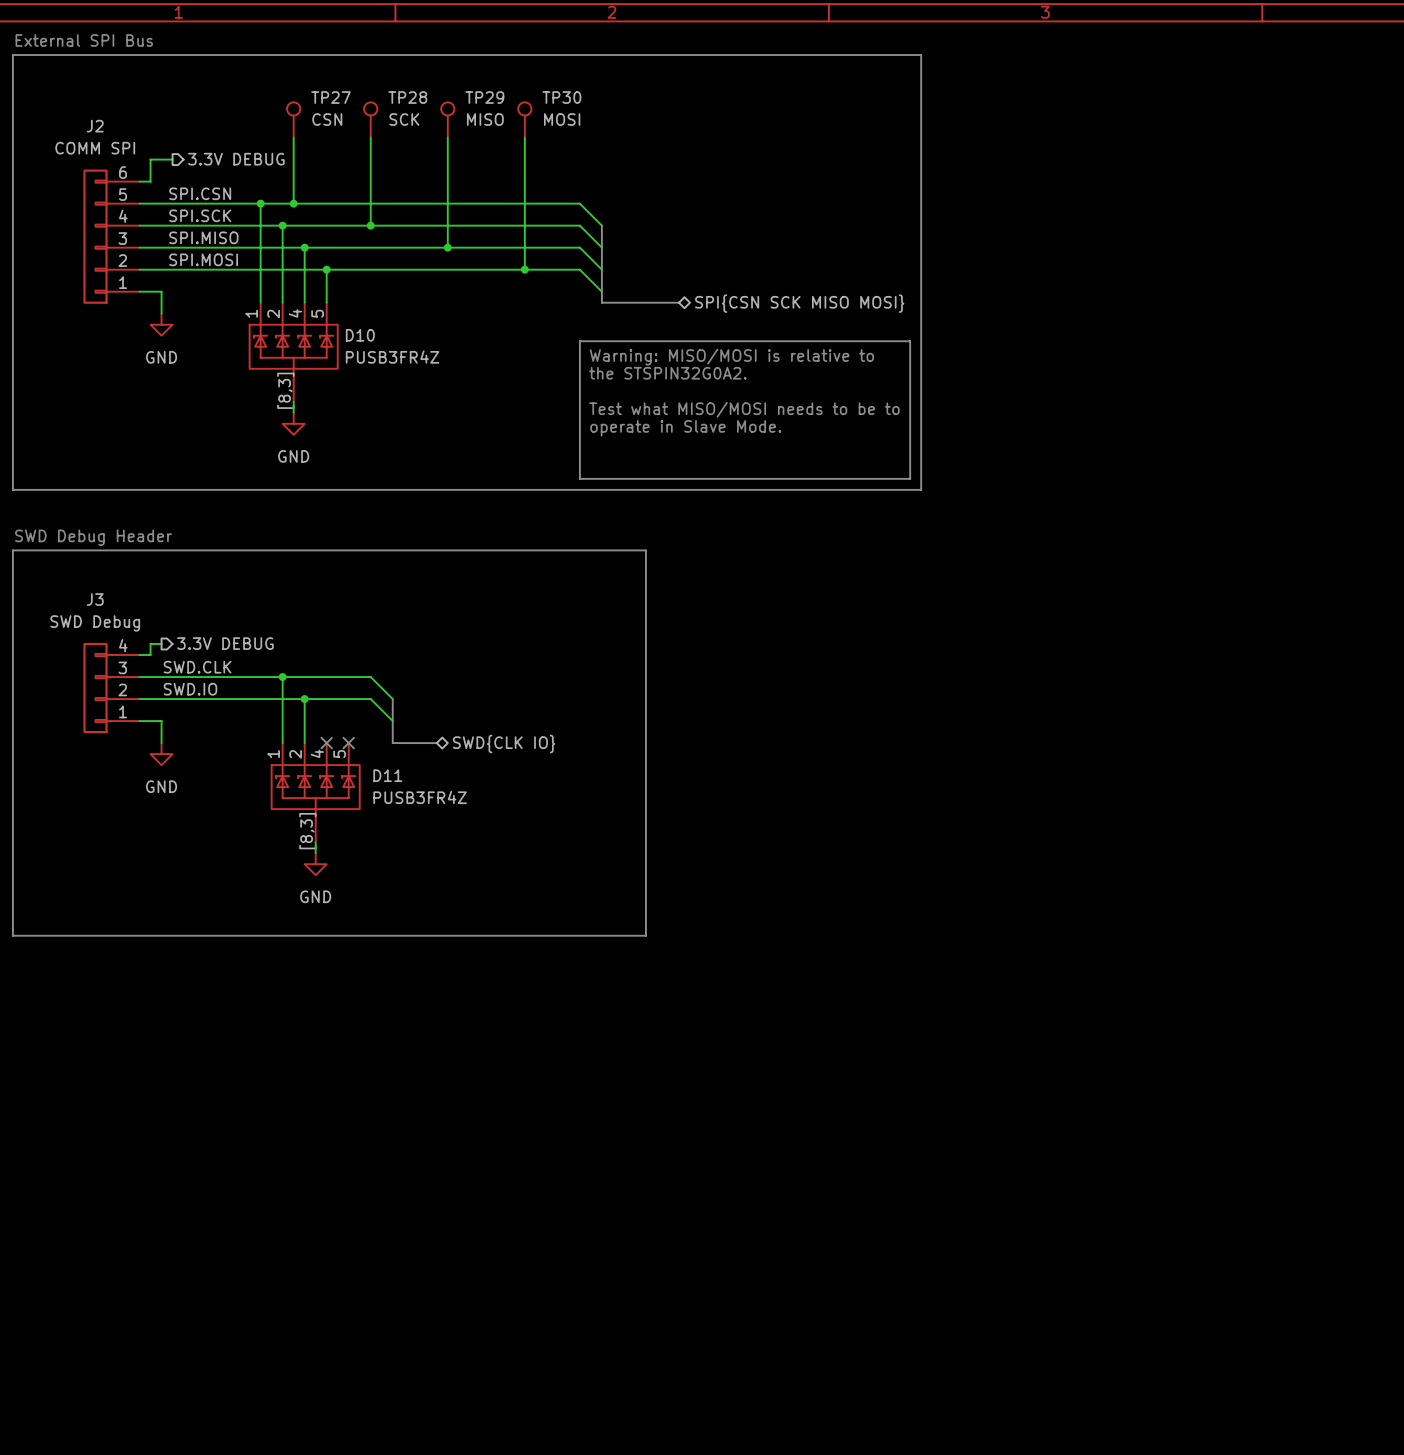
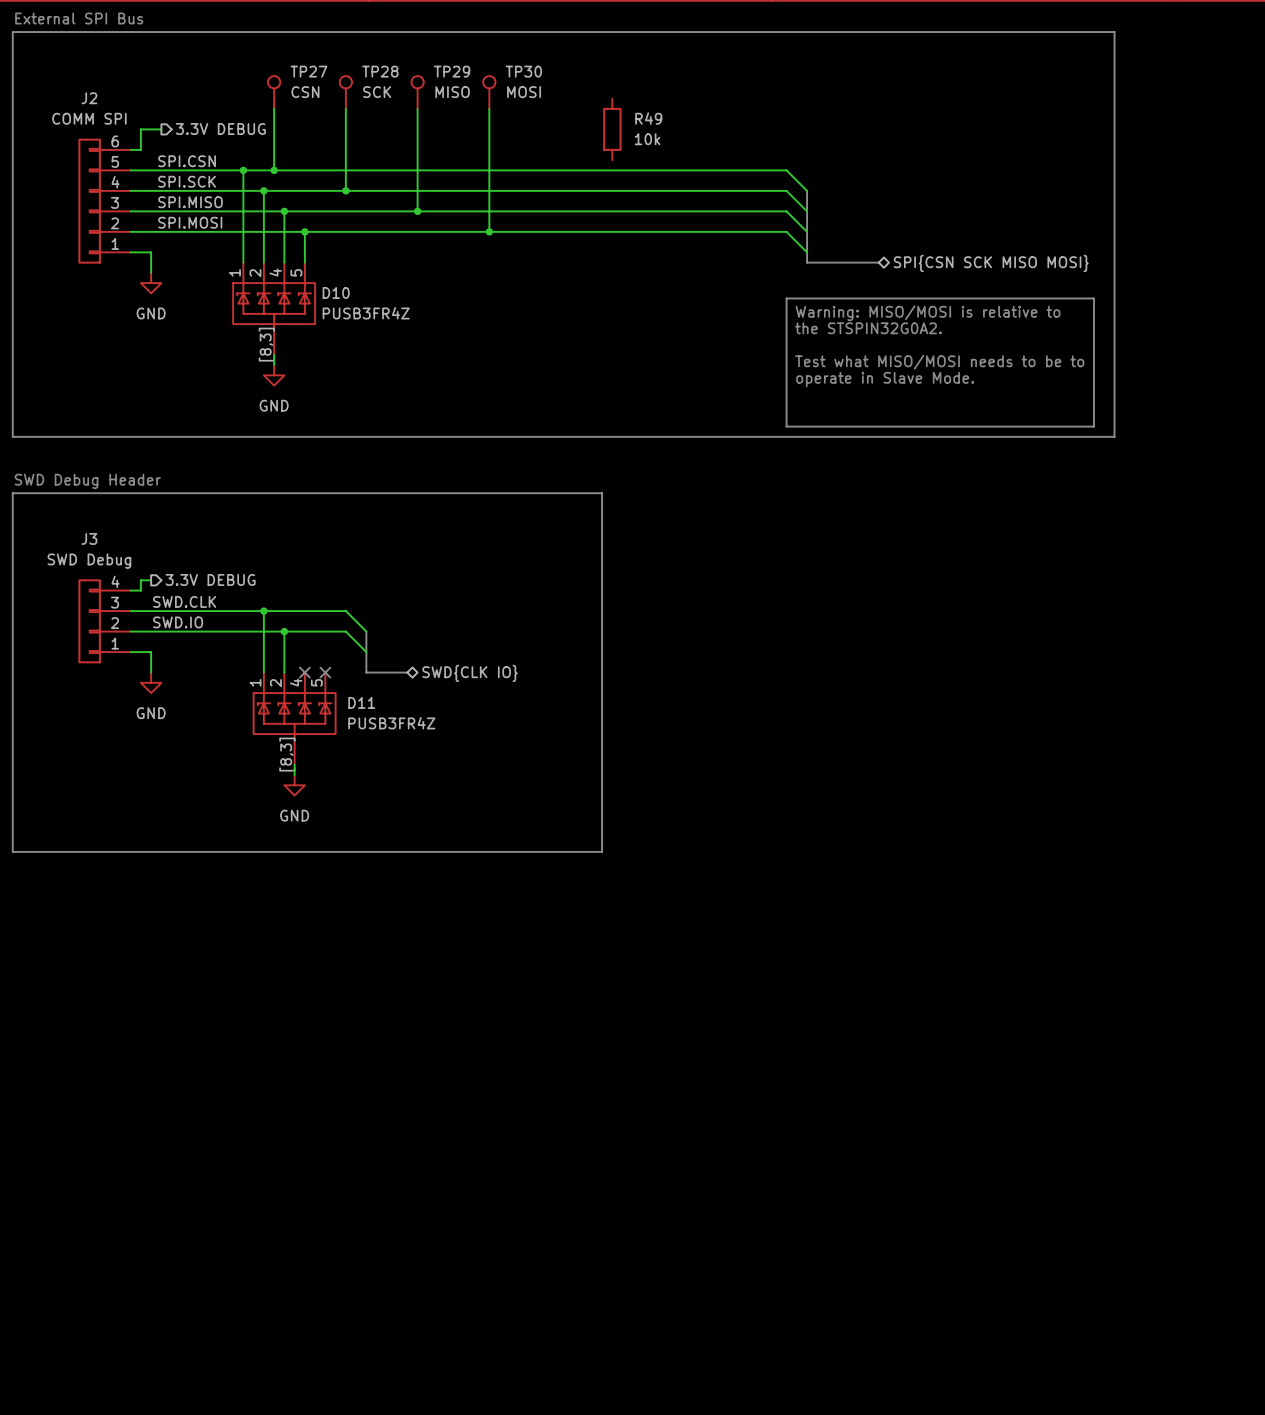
line: (921, 55) (921, 489) -> (858, 32) (1114, 32) (1114, 436) (858, 436)
R49: none -> 10k (612, 129)
wire: (579, 203) (601, 225) -> (540, 170) (786, 170) (807, 190)
wire: (579, 225) (601, 247) -> (540, 190) (786, 190) (807, 211)
bus: (601, 225) (601, 302) (678, 302) -> none
bus: none -> (807, 190) (807, 262) (878, 262)
wire: (579, 247) (601, 269) -> (540, 211) (786, 211) (807, 231)
wire: (579, 269) (601, 291) -> (540, 231) (786, 231) (807, 252)
hierarchical label: SPI{CSN SCK MISO MOSI} (799, 303) -> none
hierarchical label: none -> SPI{CSN SCK MISO MOSI} (991, 263)
line: (844, 341) (579, 341) (579, 478) (844, 478) -> (786, 298) (786, 426)
line: (910, 341) (910, 478) -> (848, 298) (1094, 298) (1094, 426) (848, 426)
text: Warning: MISO/MOSI is relative to (731, 357) -> none
text: none -> Warning: MISO/MOSI is relative to (928, 313)
text: the STSPIN32G0A2. (667, 373) -> none
text: none -> the STSPIN32G0A2. (868, 328)
text: Test what MISO/MOSI needs to be to (744, 409) -> none
text: none -> Test what MISO/MOSI needs to be to (939, 362)
text: operate in Slave Mode. (685, 428) -> none
text: none -> operate in Slave Mode. (885, 379)

